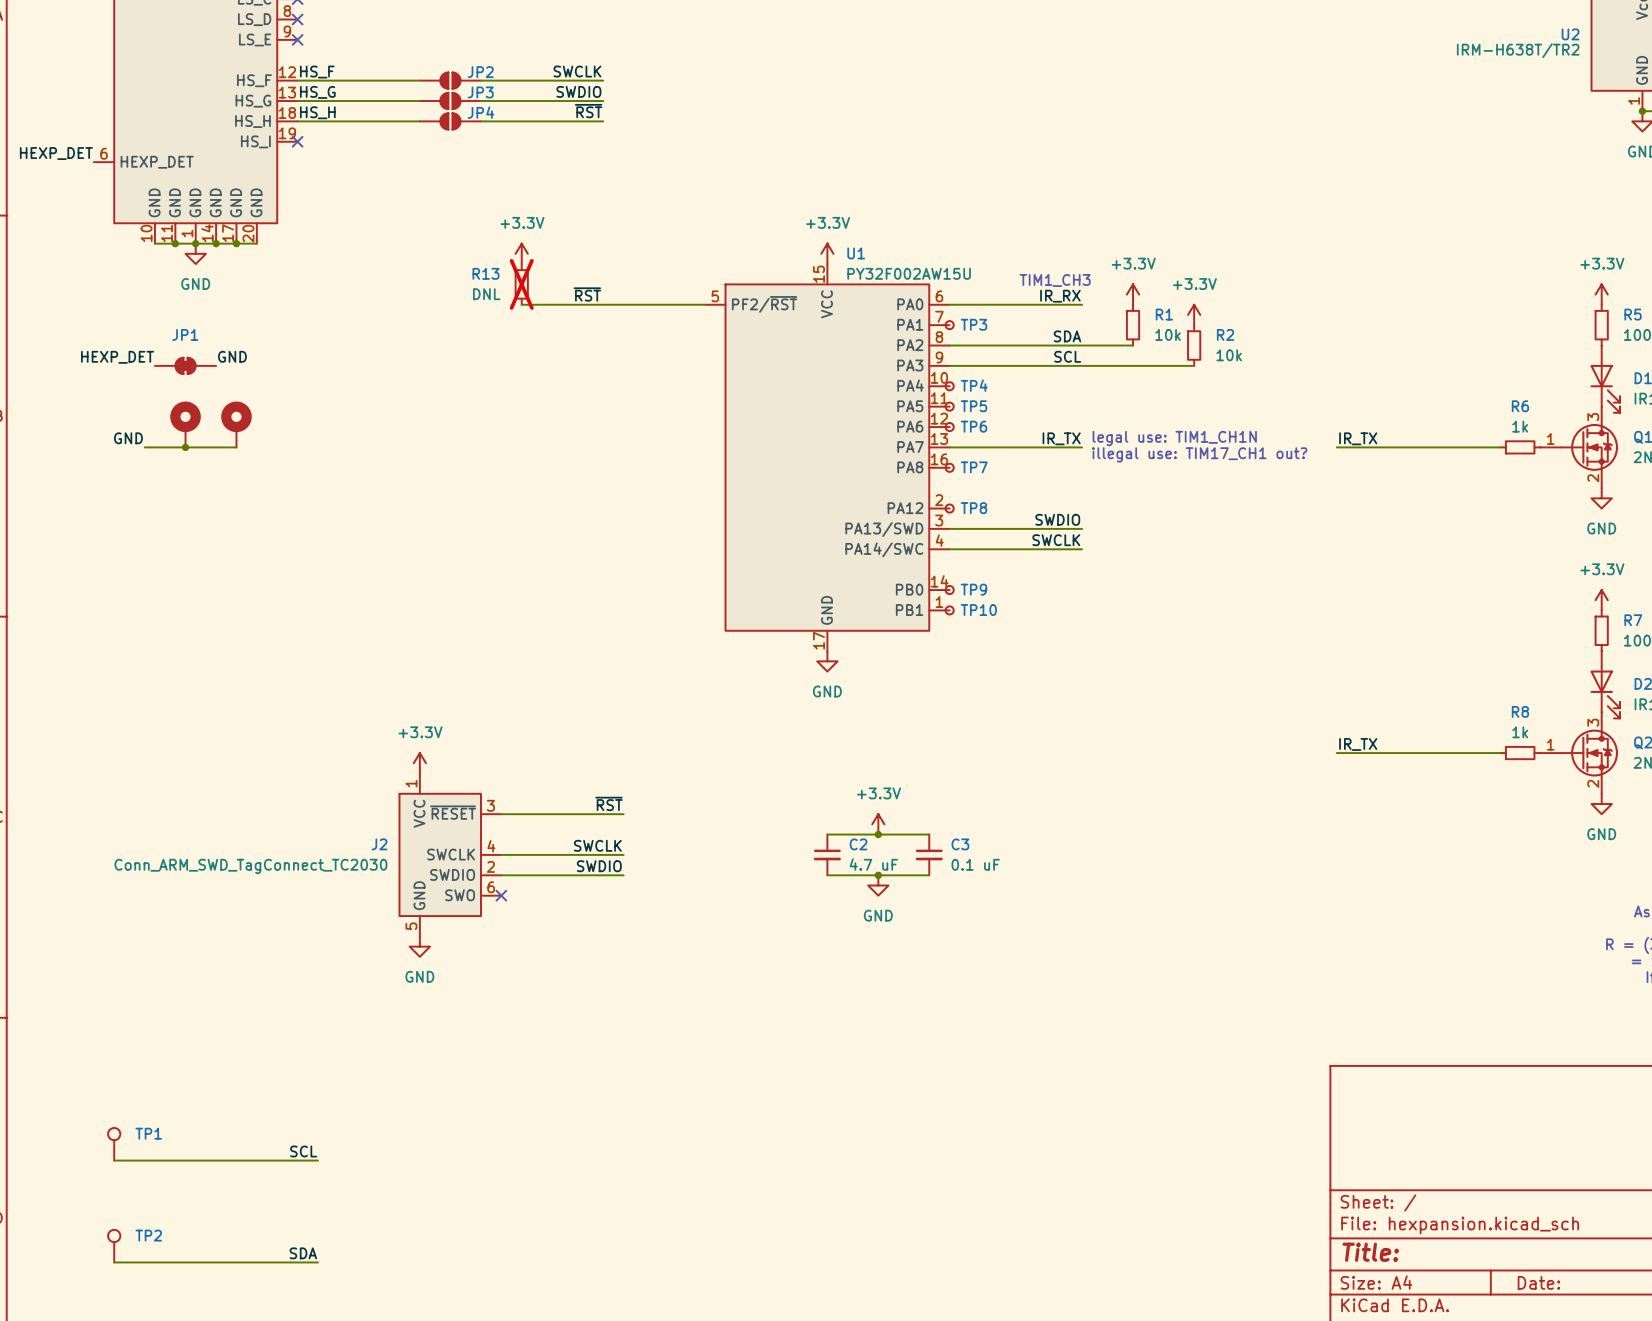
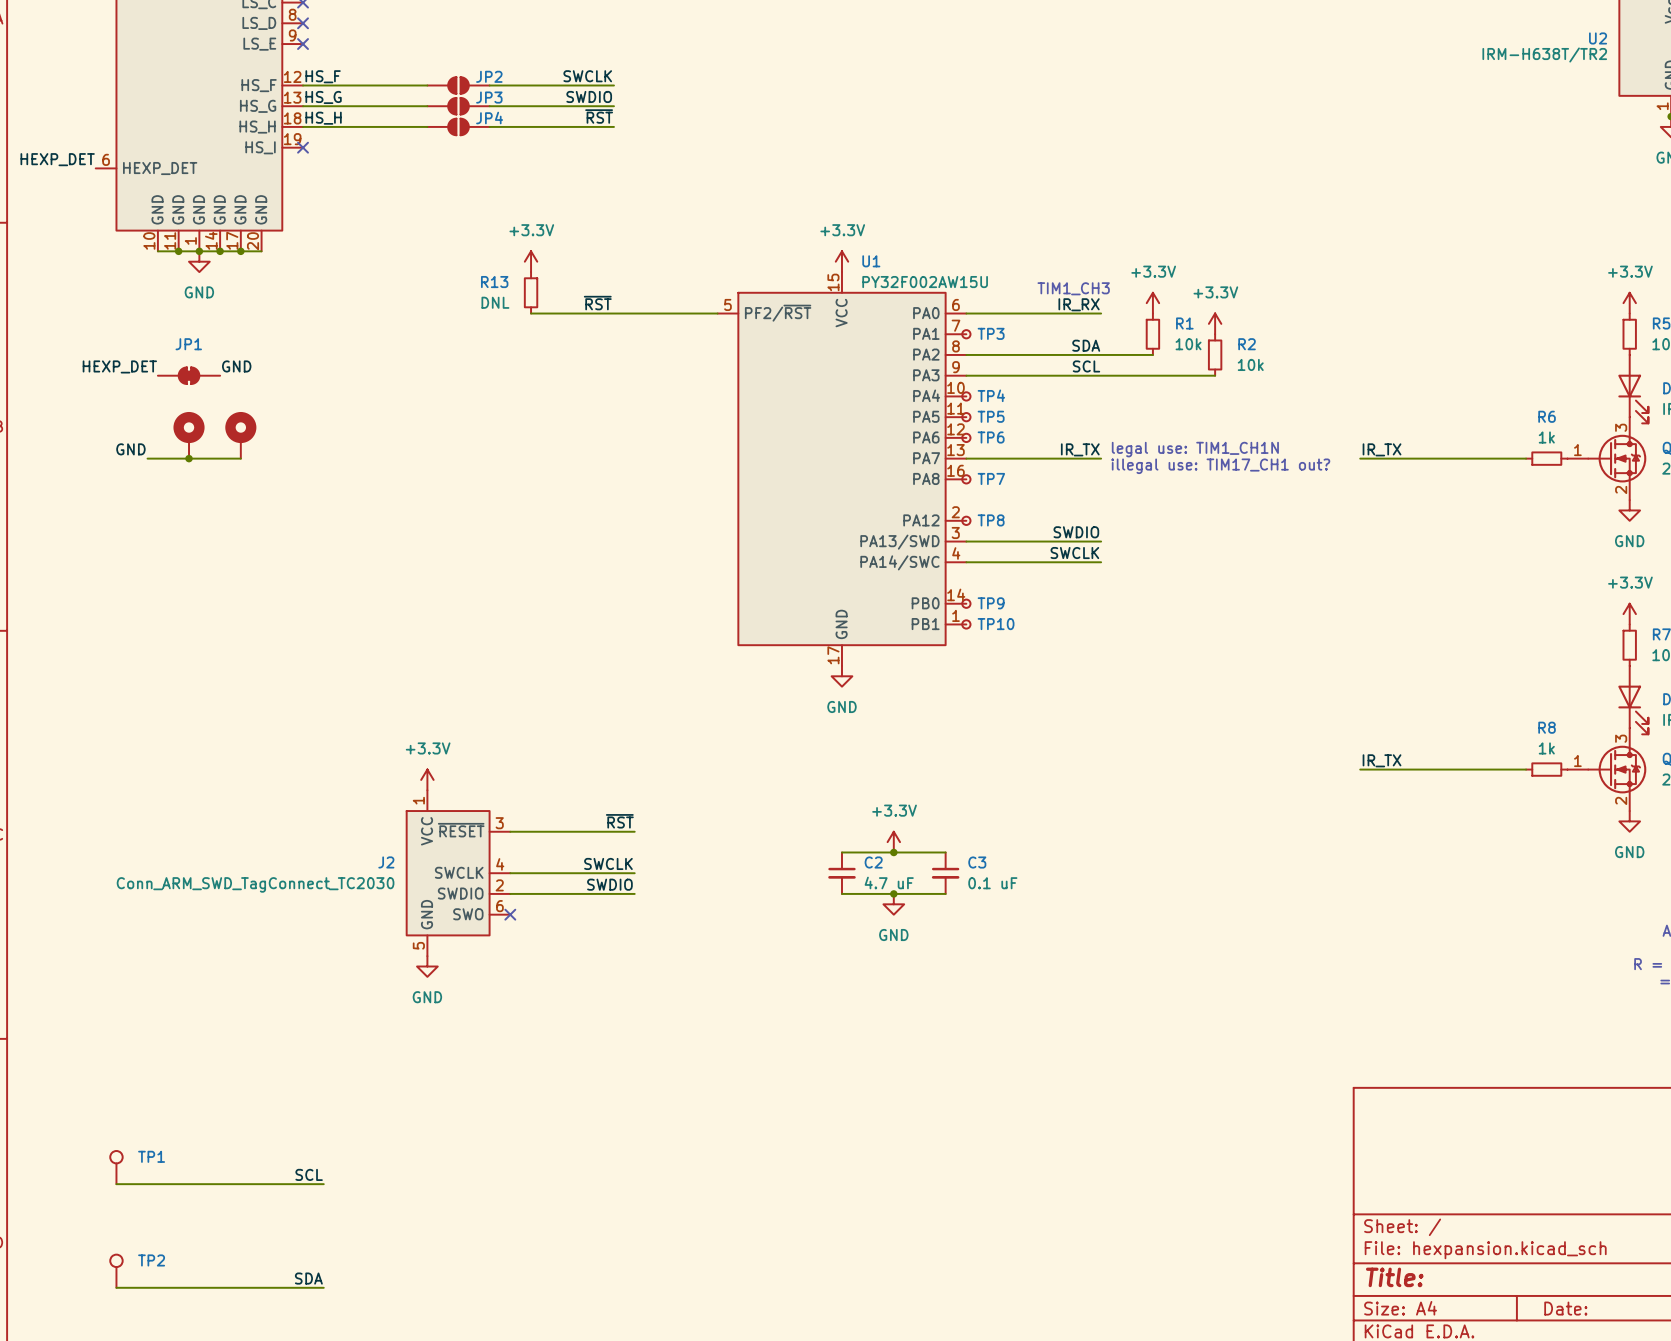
R13 do-not-place cross: (521, 284) -> none

